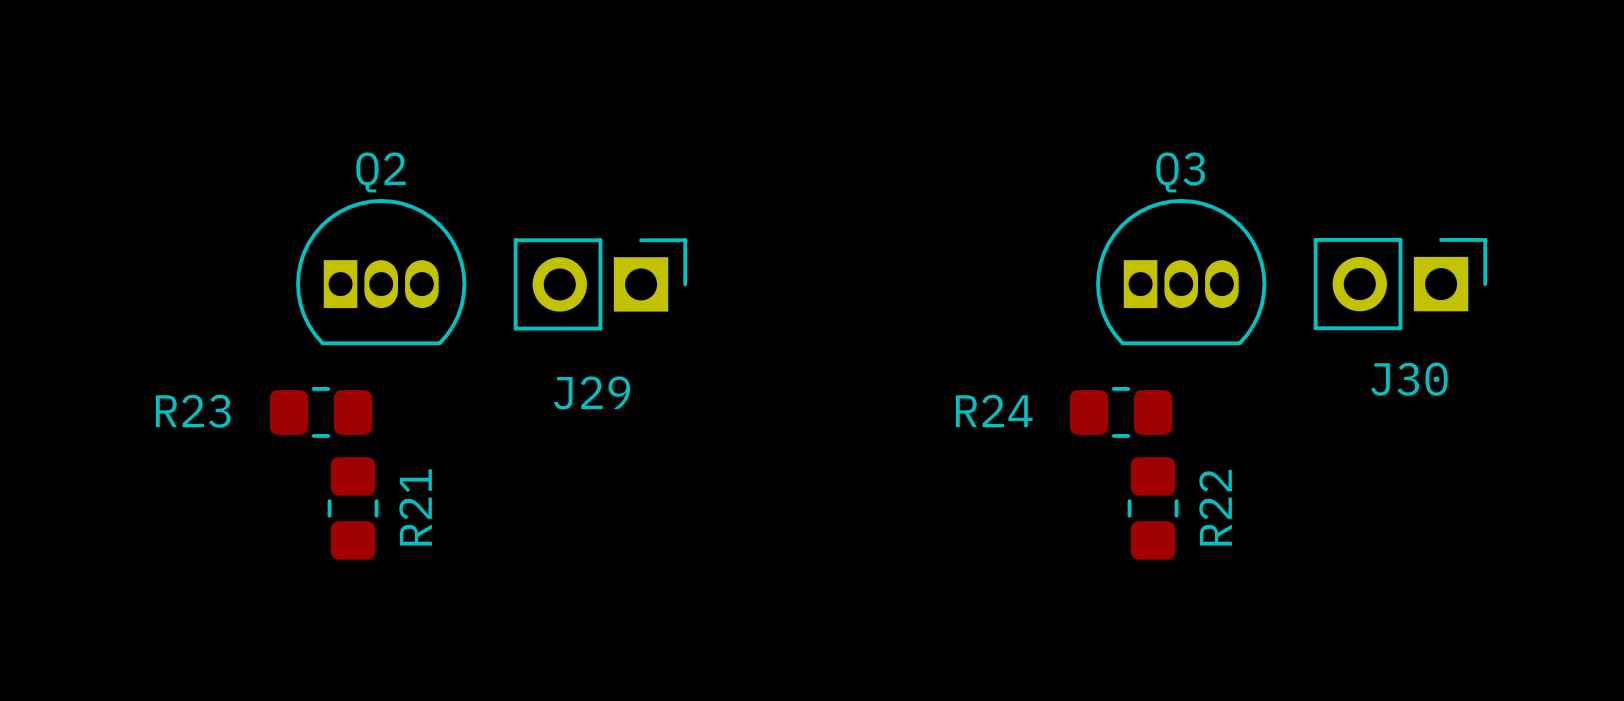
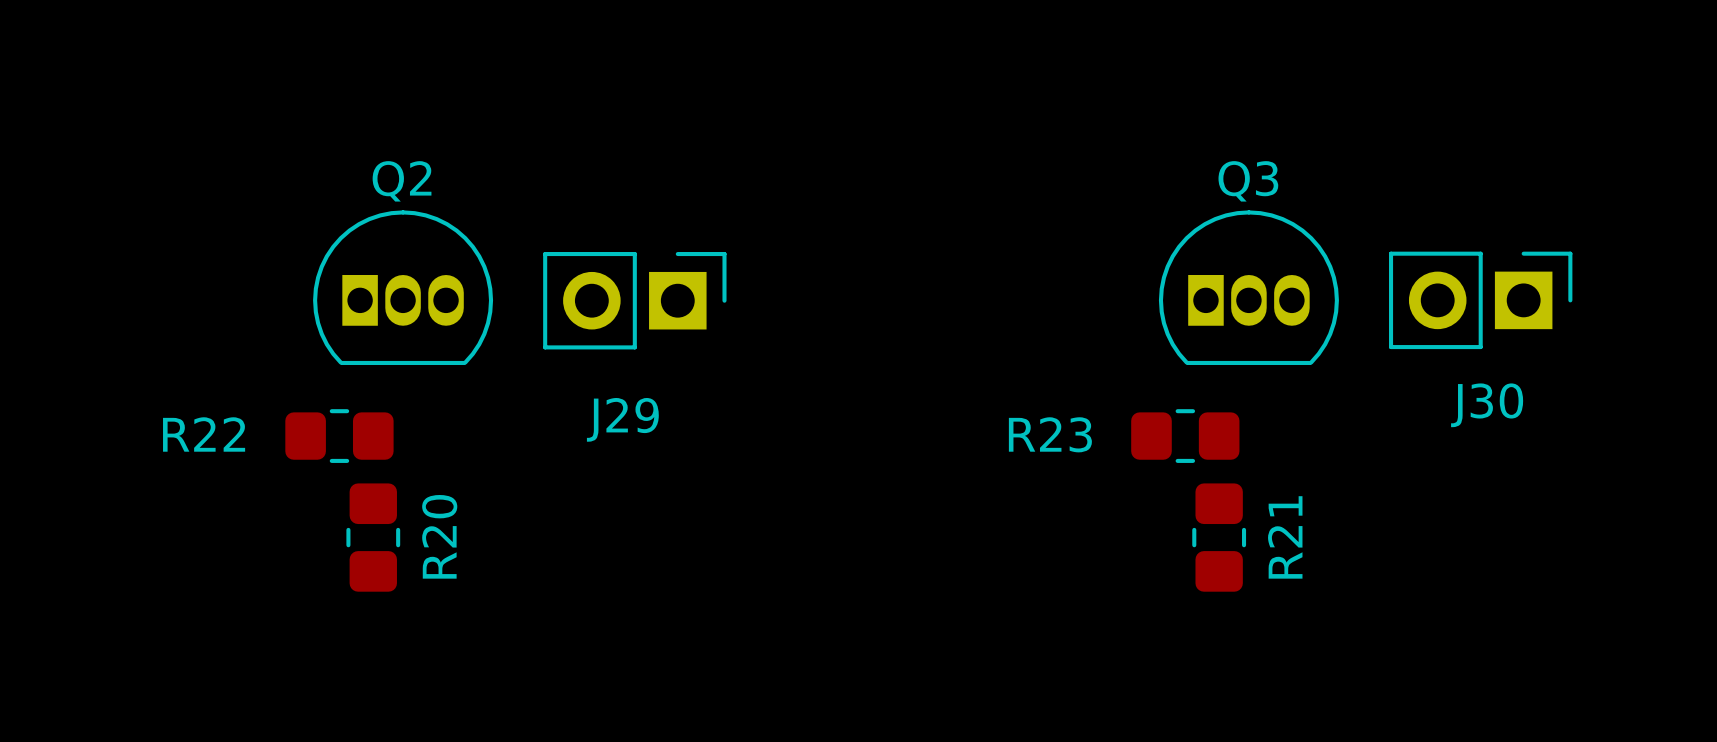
R24 name: R24 (994, 410) -> R23 (1050, 434)
R23 name: R23 (193, 411) -> R22 (204, 434)
R21 name: R21 (415, 507) -> R20 (439, 536)
R22 name: R22 (1215, 507) -> R21 (1285, 537)

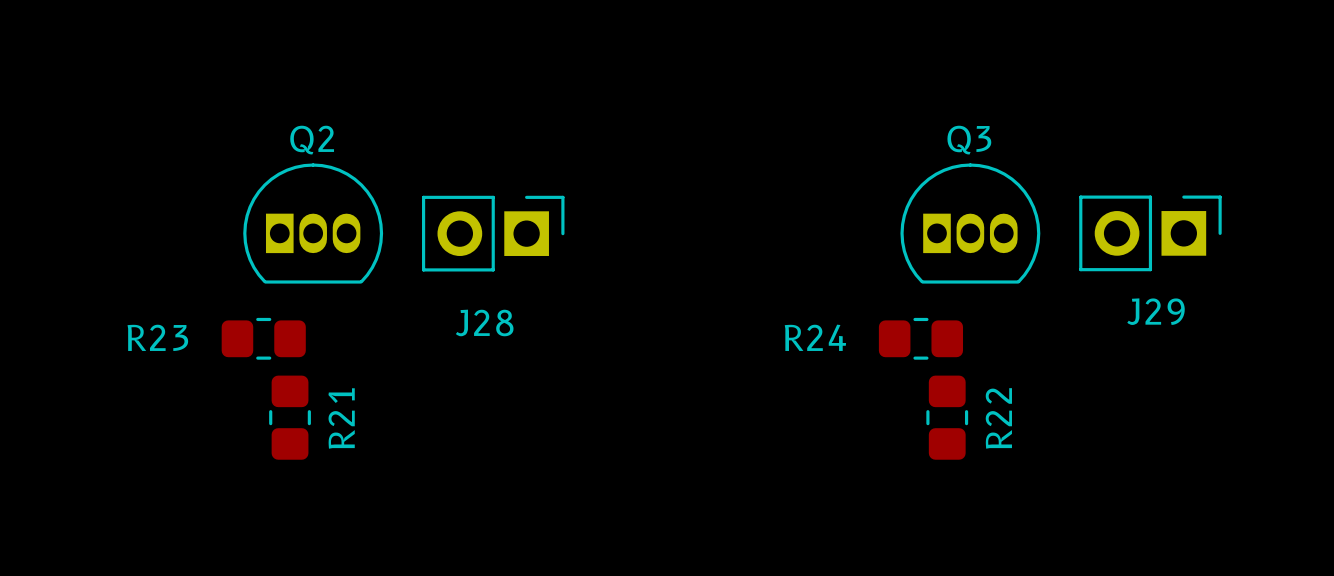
J30 name: J30 (1487, 405) -> J29 (1156, 311)
J29 name: J29 (622, 419) -> J28 (484, 322)
R22 name: R22 (204, 434) -> R23 (157, 337)
R23 name: R23 (1050, 434) -> R24 (815, 337)
R20 name: R20 (439, 536) -> R21 (341, 418)
R21 name: R21 (1285, 537) -> R22 (998, 418)

